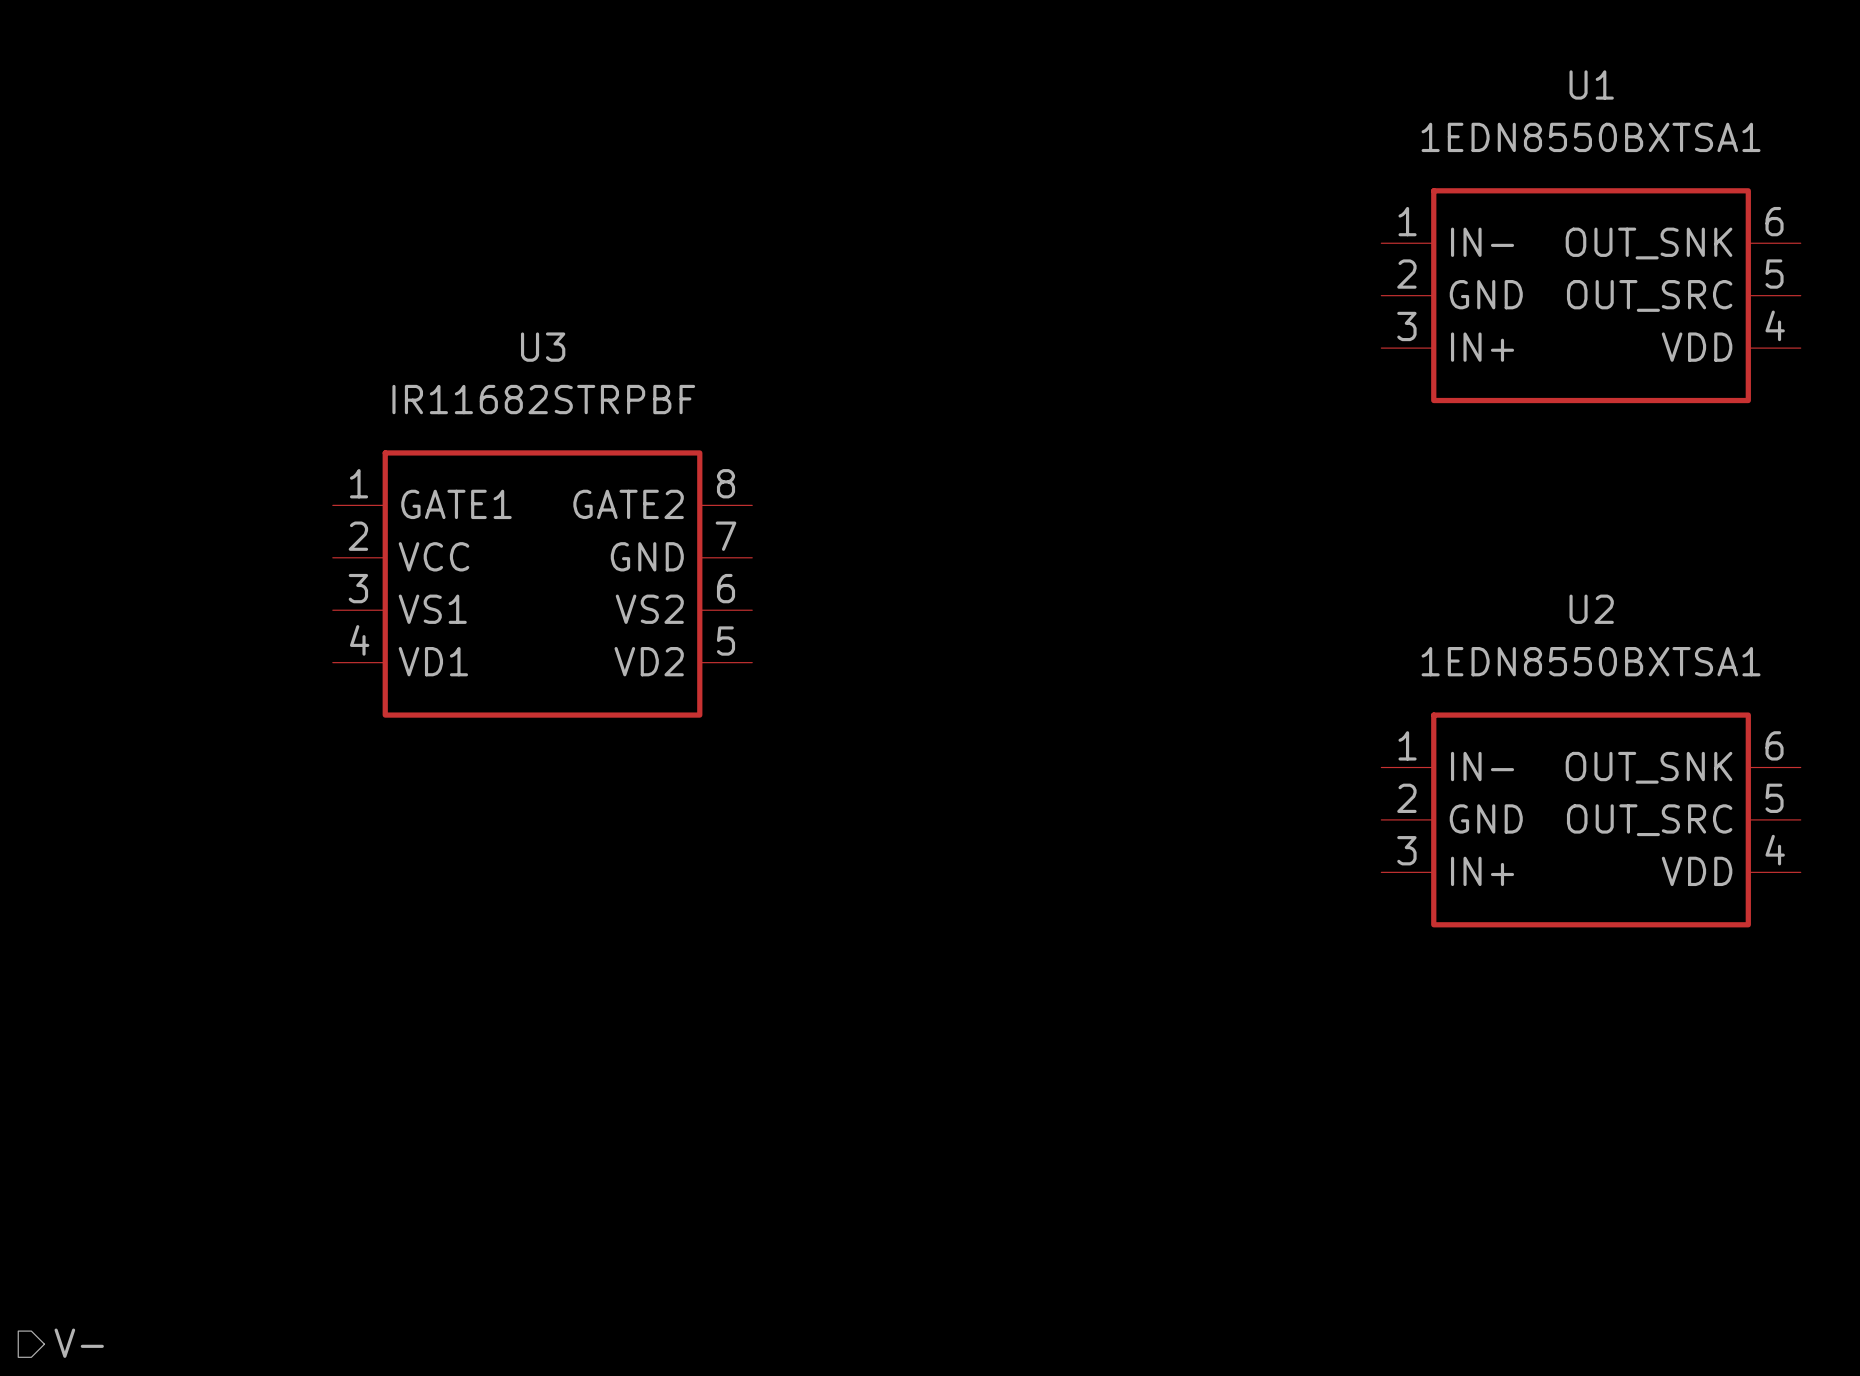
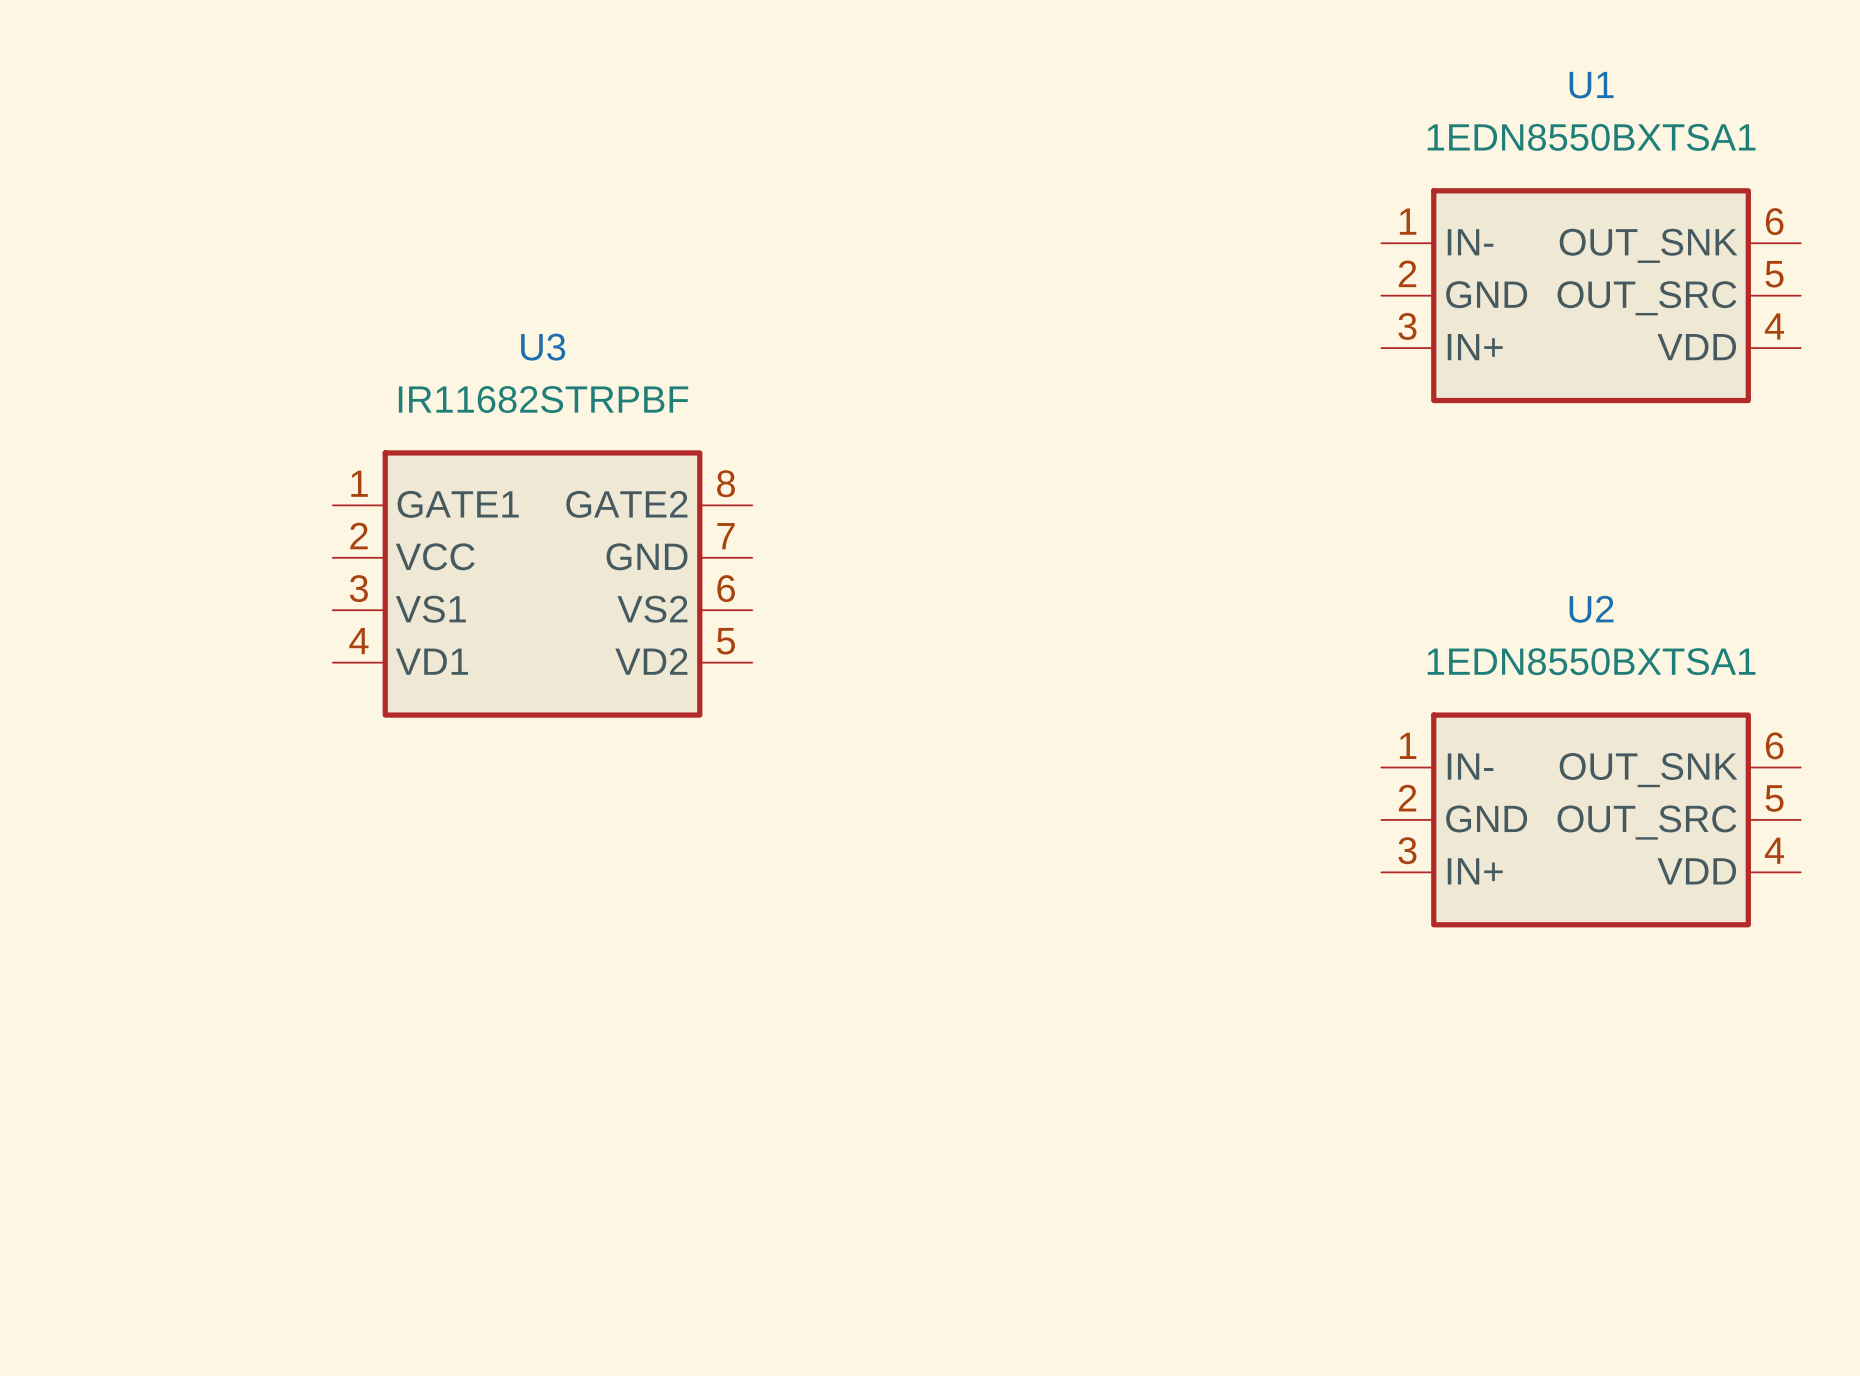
hierarchical label: V- (79, 1343) -> none

